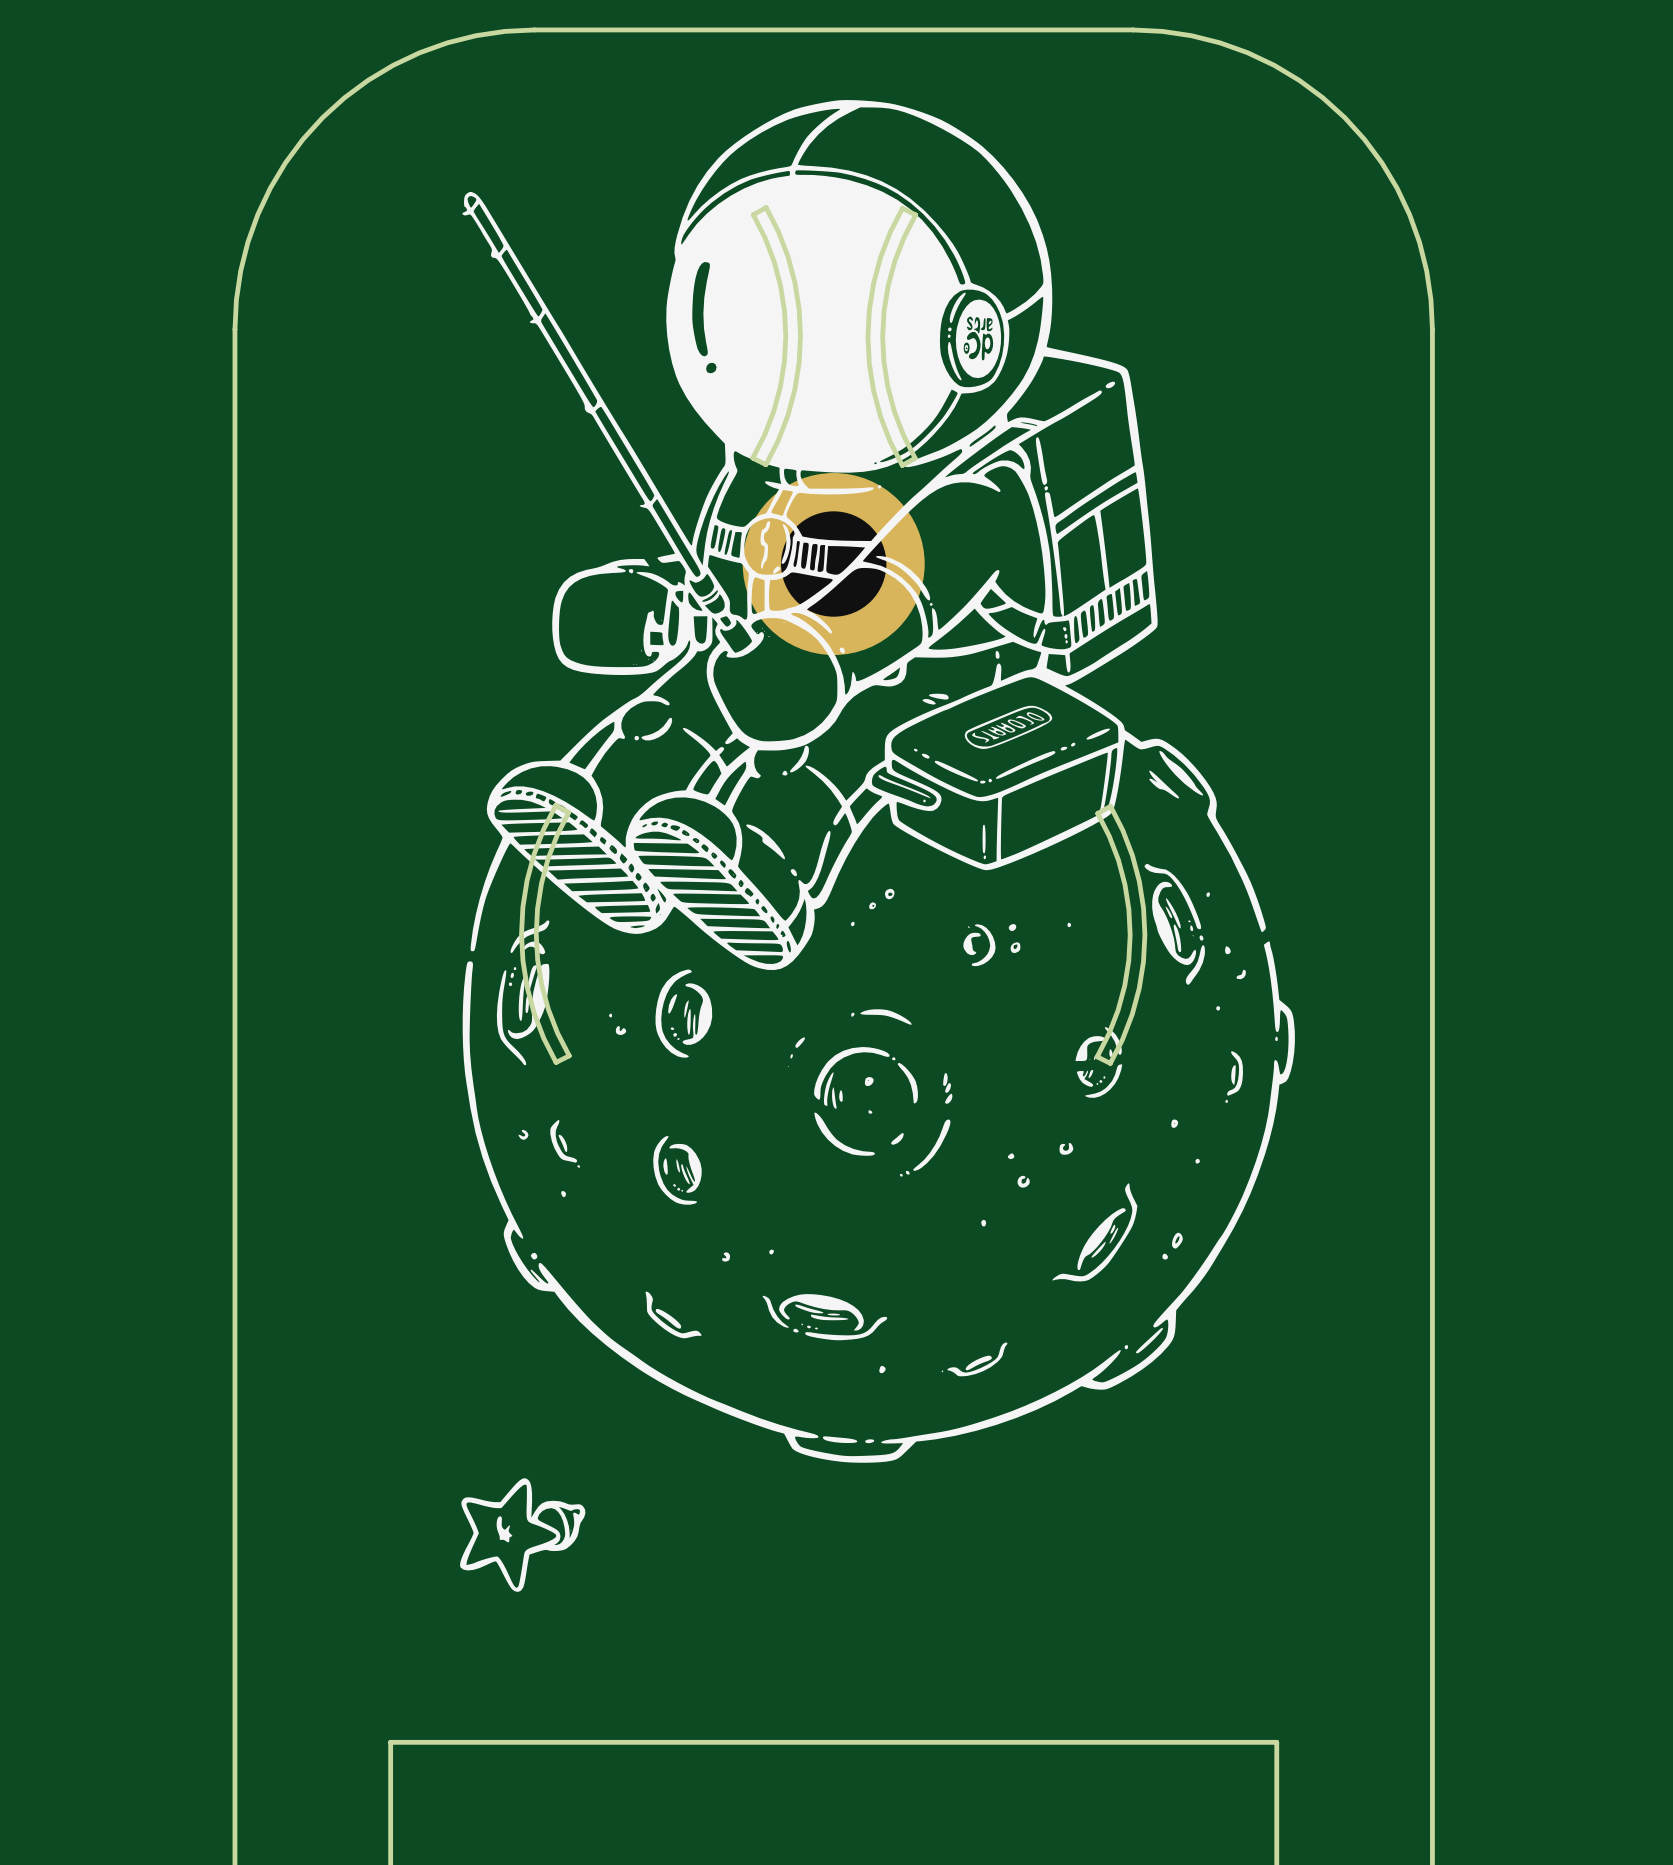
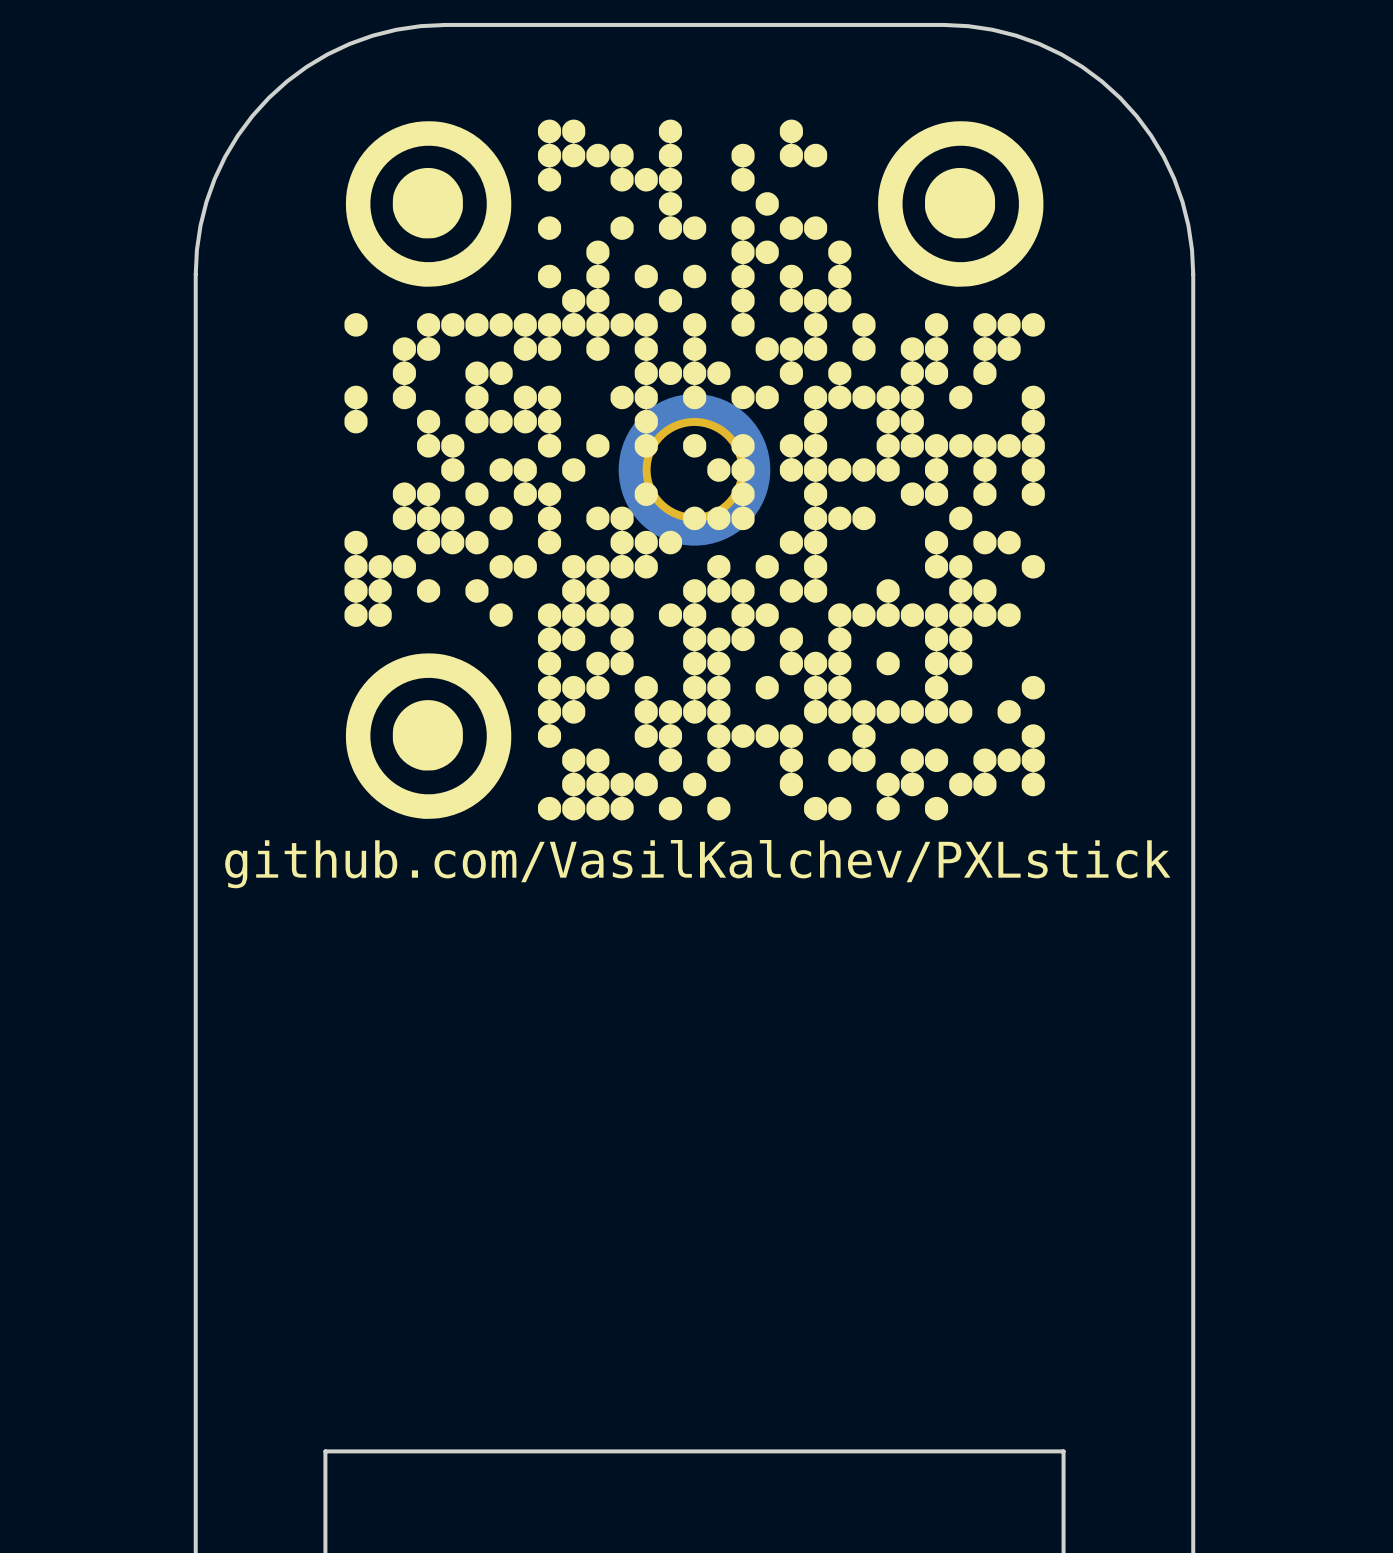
drawing: [459, 100, 1295, 1592] -> none
drawing: none -> [344, 119, 1045, 821]
board edge: (766, 207) (753, 214) (774, 261) (784, 311) (785, 336) (784, 361) (773, 411) (752, 458) (765, 464) (778, 440) (794, 389) (800, 336) (799, 309) (788, 256) (766, 207) -> none
board edge: (902, 208) (915, 214) (894, 261) (884, 311) (882, 336) (887, 387) (894, 411) (915, 458) (902, 465) (880, 416) (873, 390) (867, 336) (869, 309) (880, 257) (902, 208) -> none
board edge: (555, 805) (568, 812) (548, 859) (537, 908) (536, 934) (537, 959) (548, 1009) (569, 1055) (556, 1062) (534, 1013) (527, 987) (521, 933) (527, 880) (534, 854) (555, 805) -> none
board edge: (1110, 806) (1097, 813) (1118, 860) (1124, 884) (1130, 935) (1124, 985) (1118, 1010) (1097, 1056) (1110, 1063) (1132, 1014) (1143, 961) (1144, 934) (1139, 881) (1132, 855) (1110, 806) -> none
text: none -> github.com/VasilKalchev/PXLstick (697, 864)

